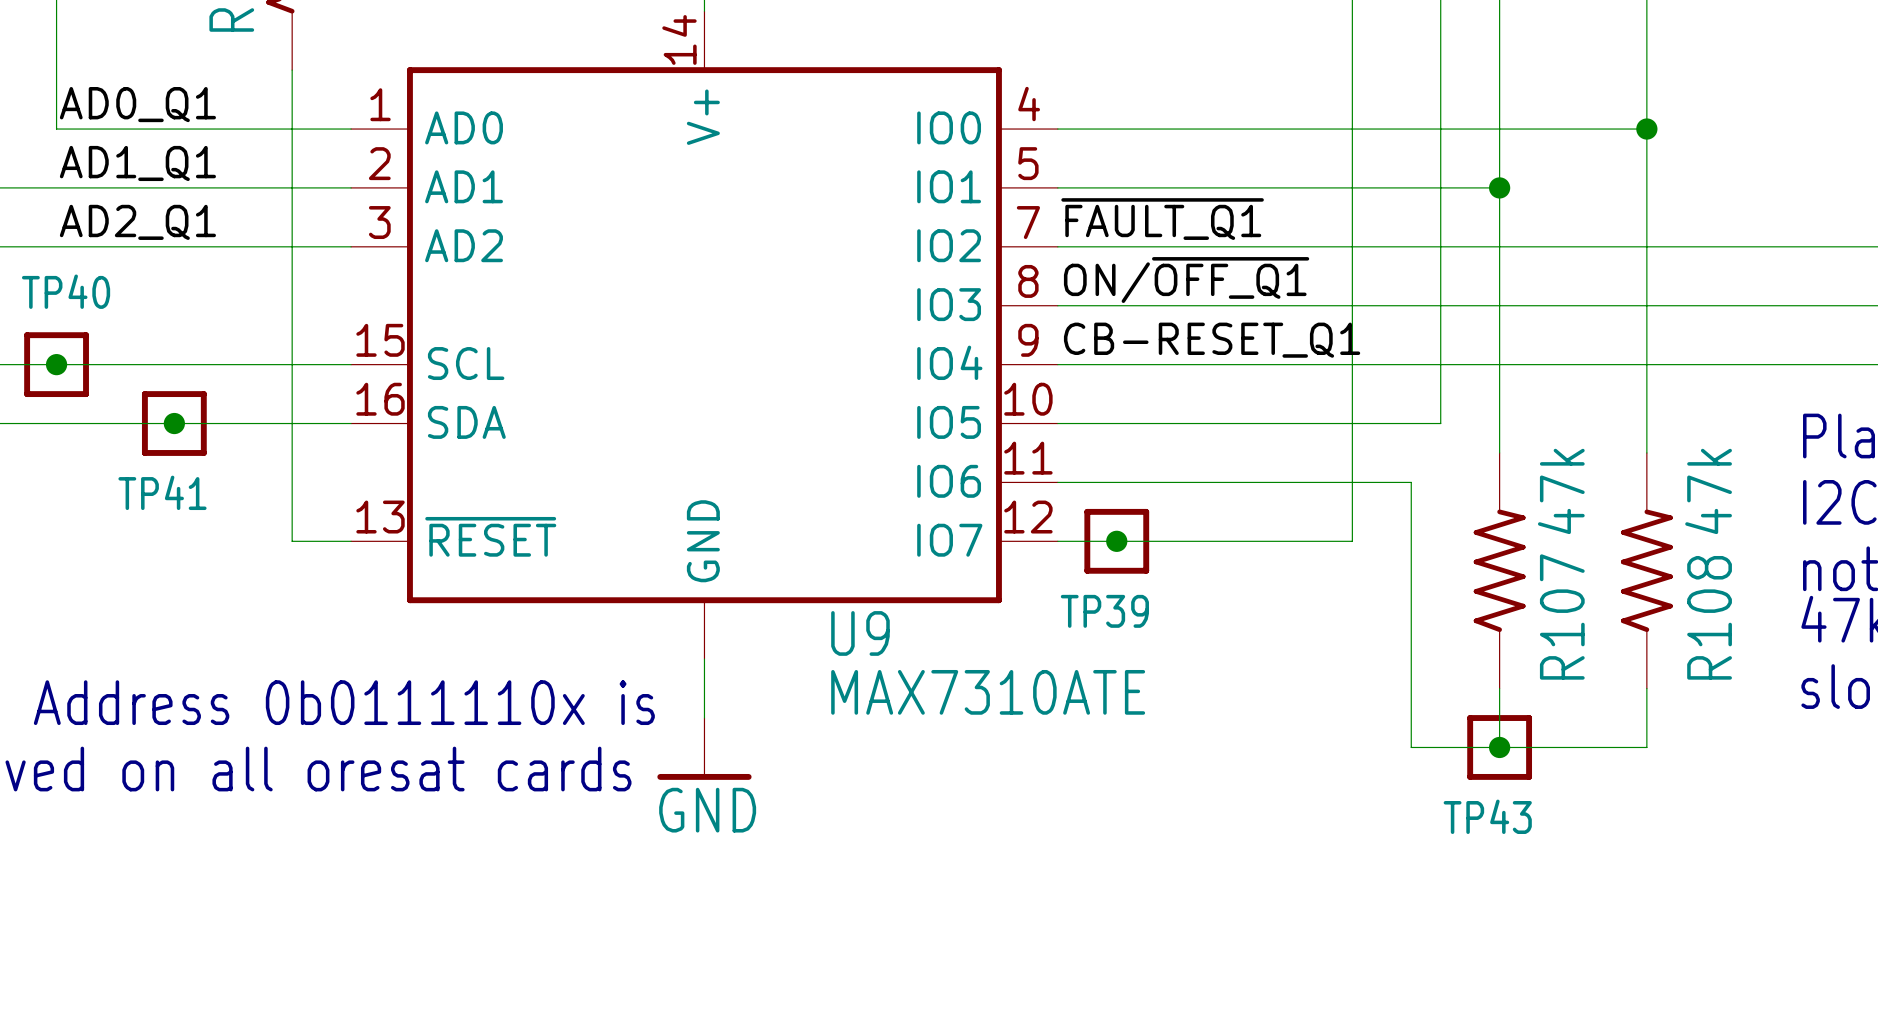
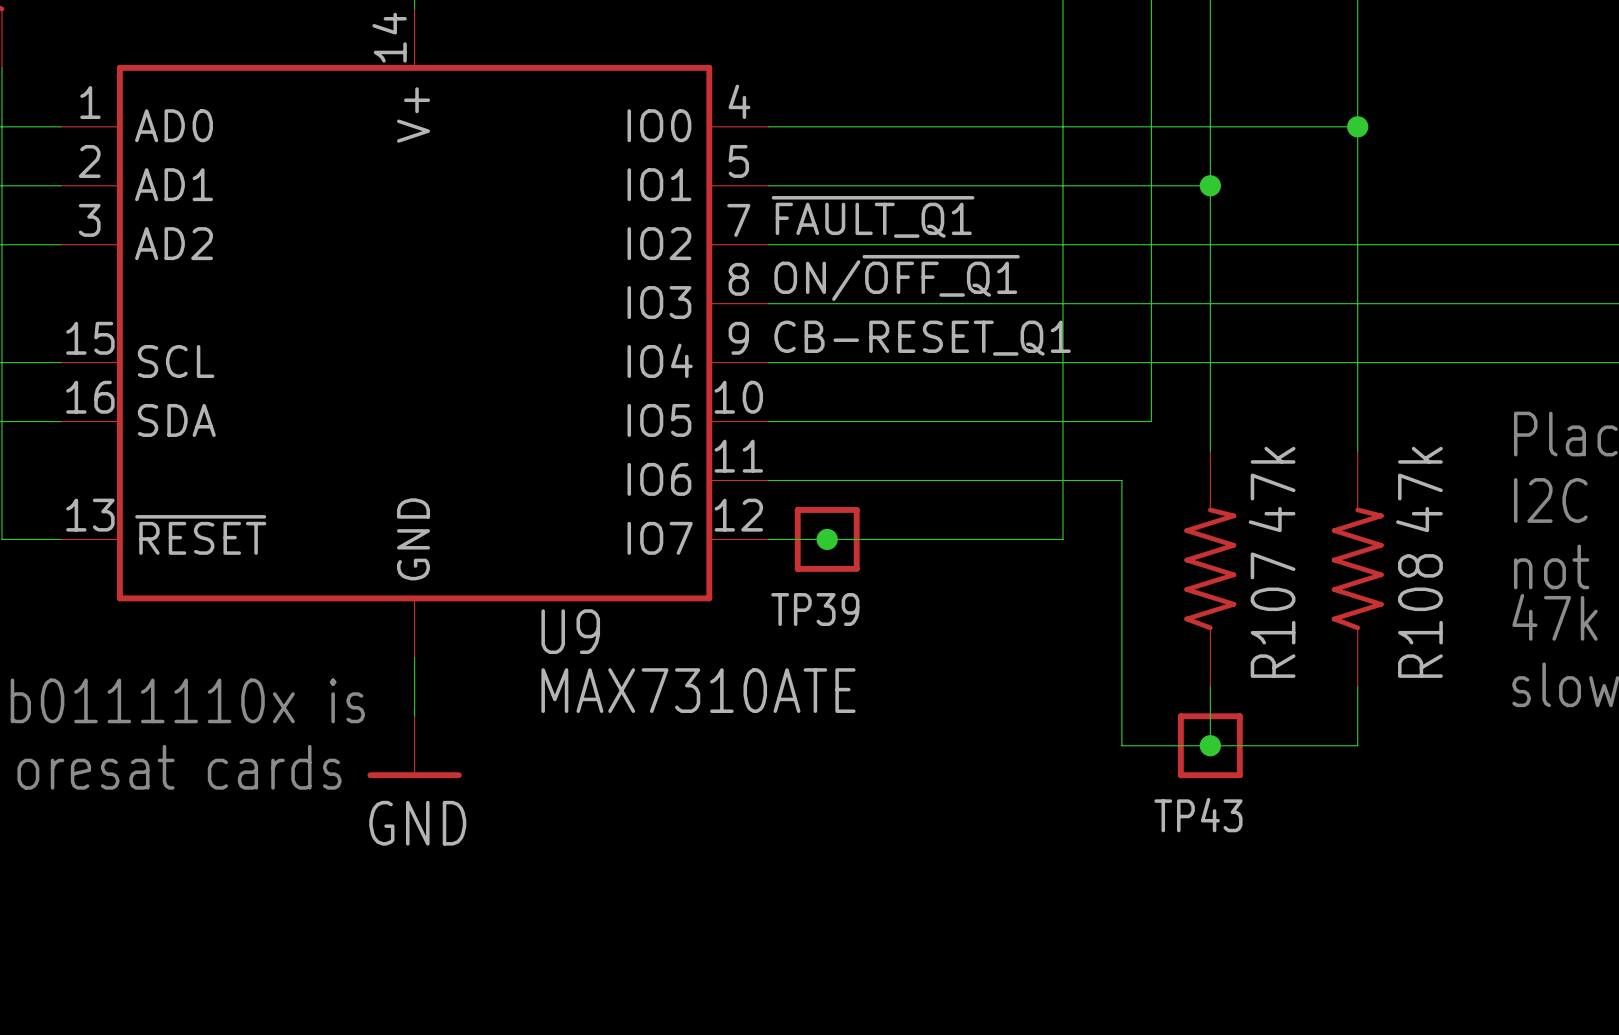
power symbol text position: GND (707, 810) -> GND (417, 823)

